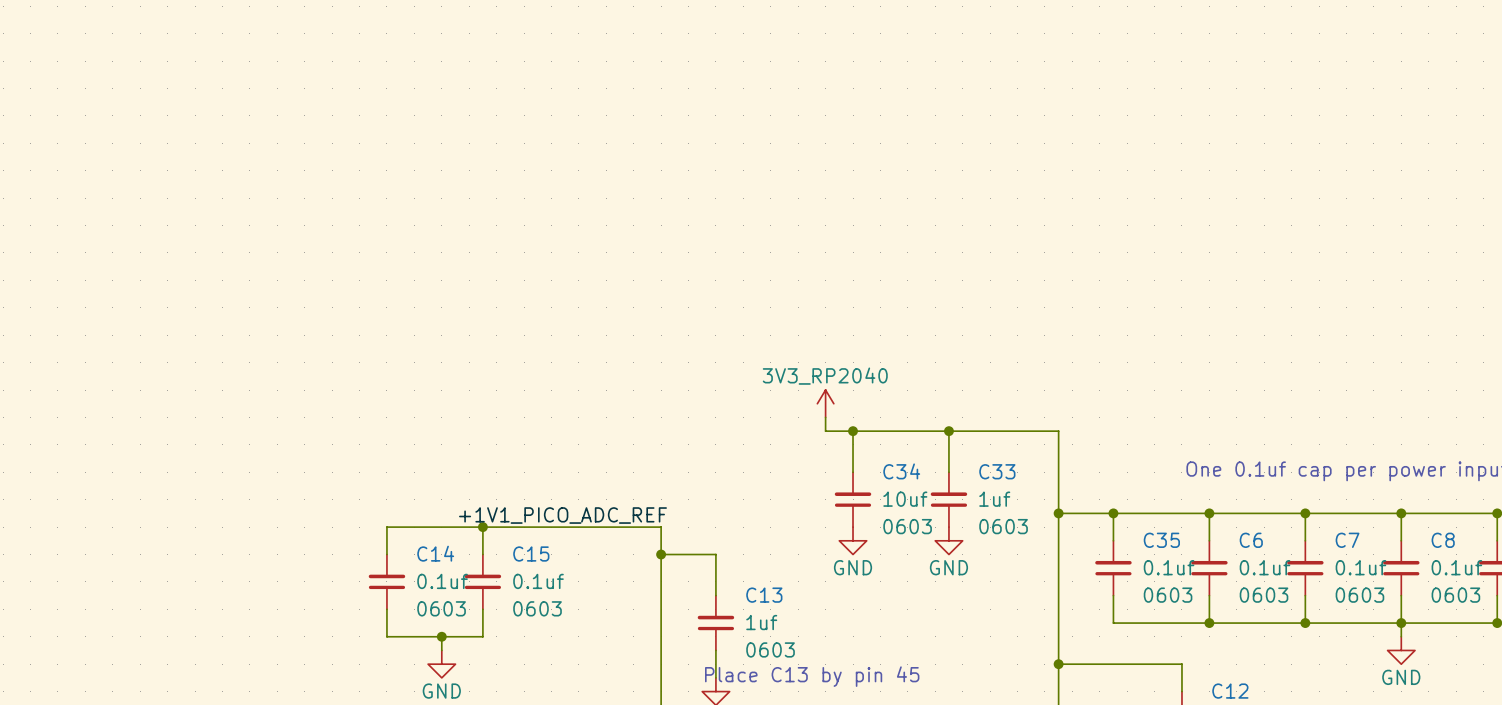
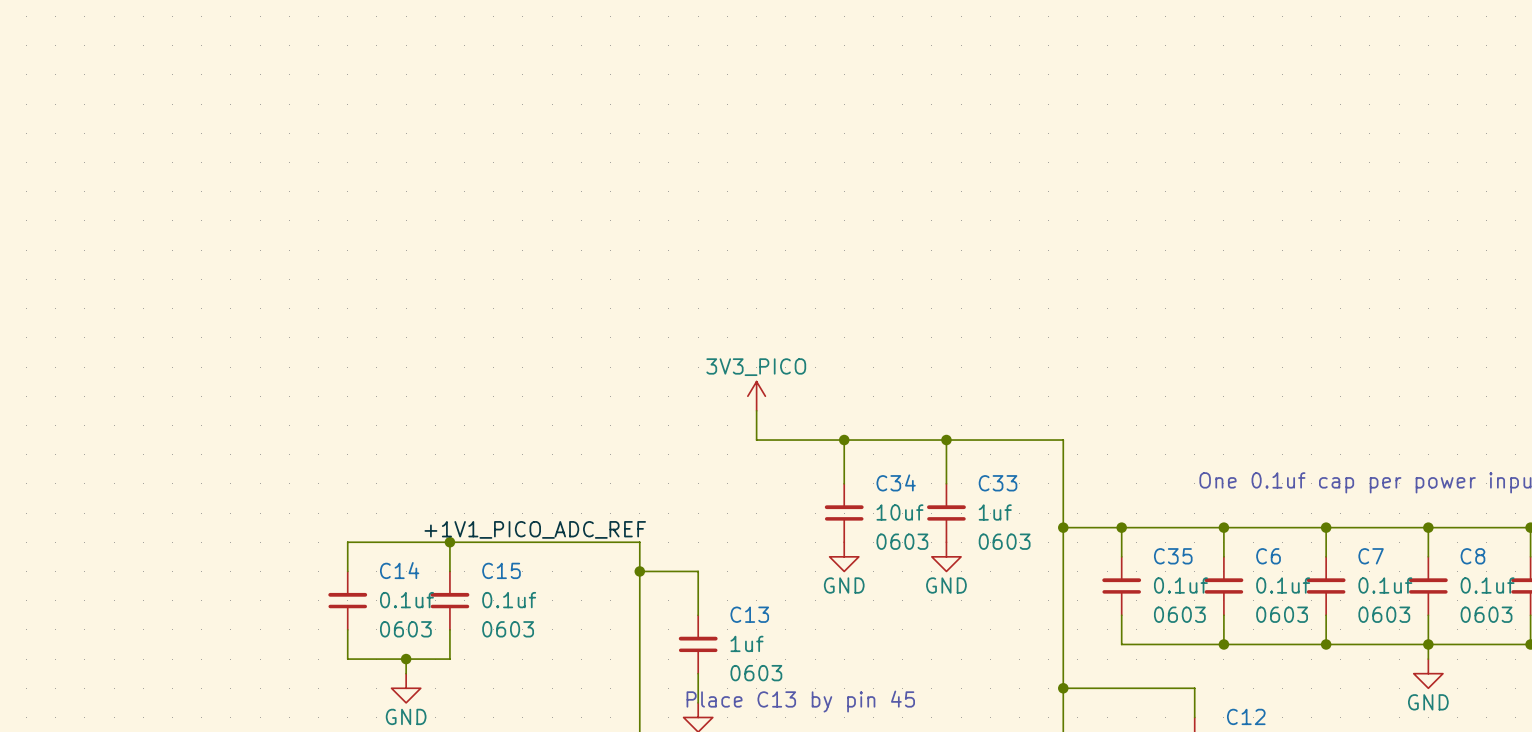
power symbol: none -> 3V3_PICO (756, 396)
power symbol: 3V3_RP2040 (825, 403) -> none
wire: (825, 417) (825, 431) -> (756, 410) (756, 440) (815, 440)

